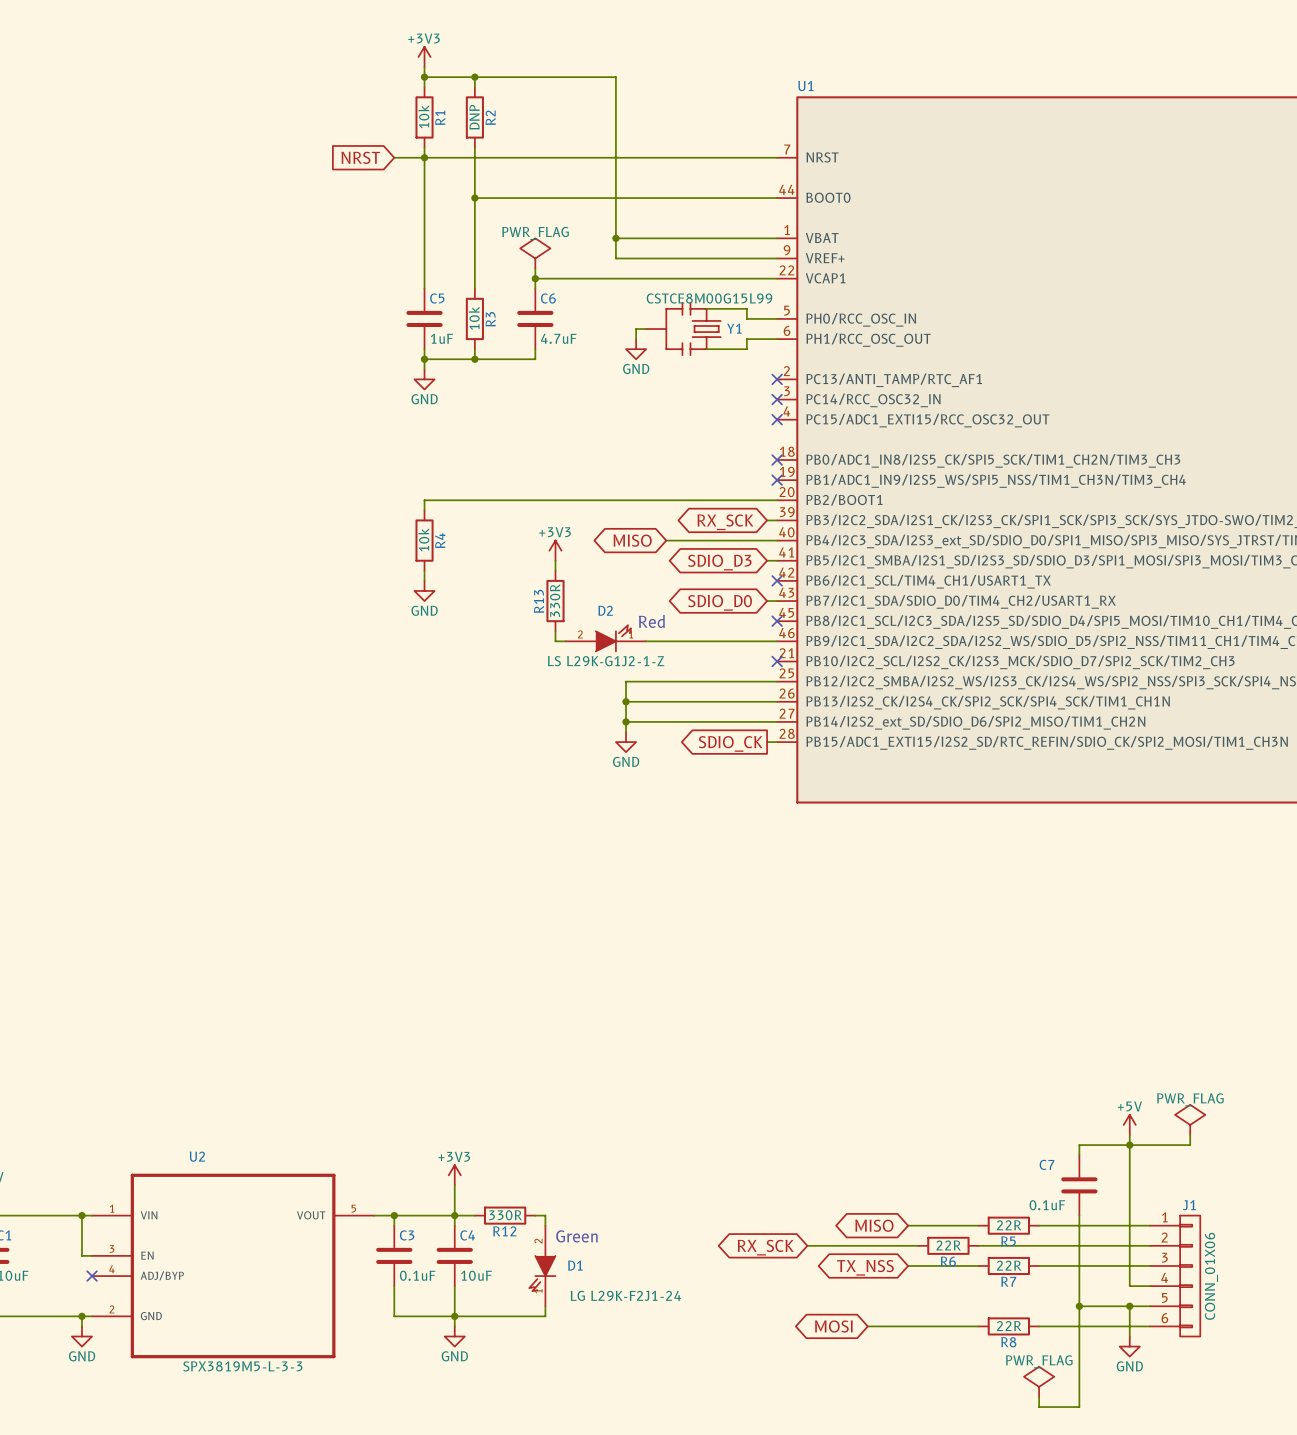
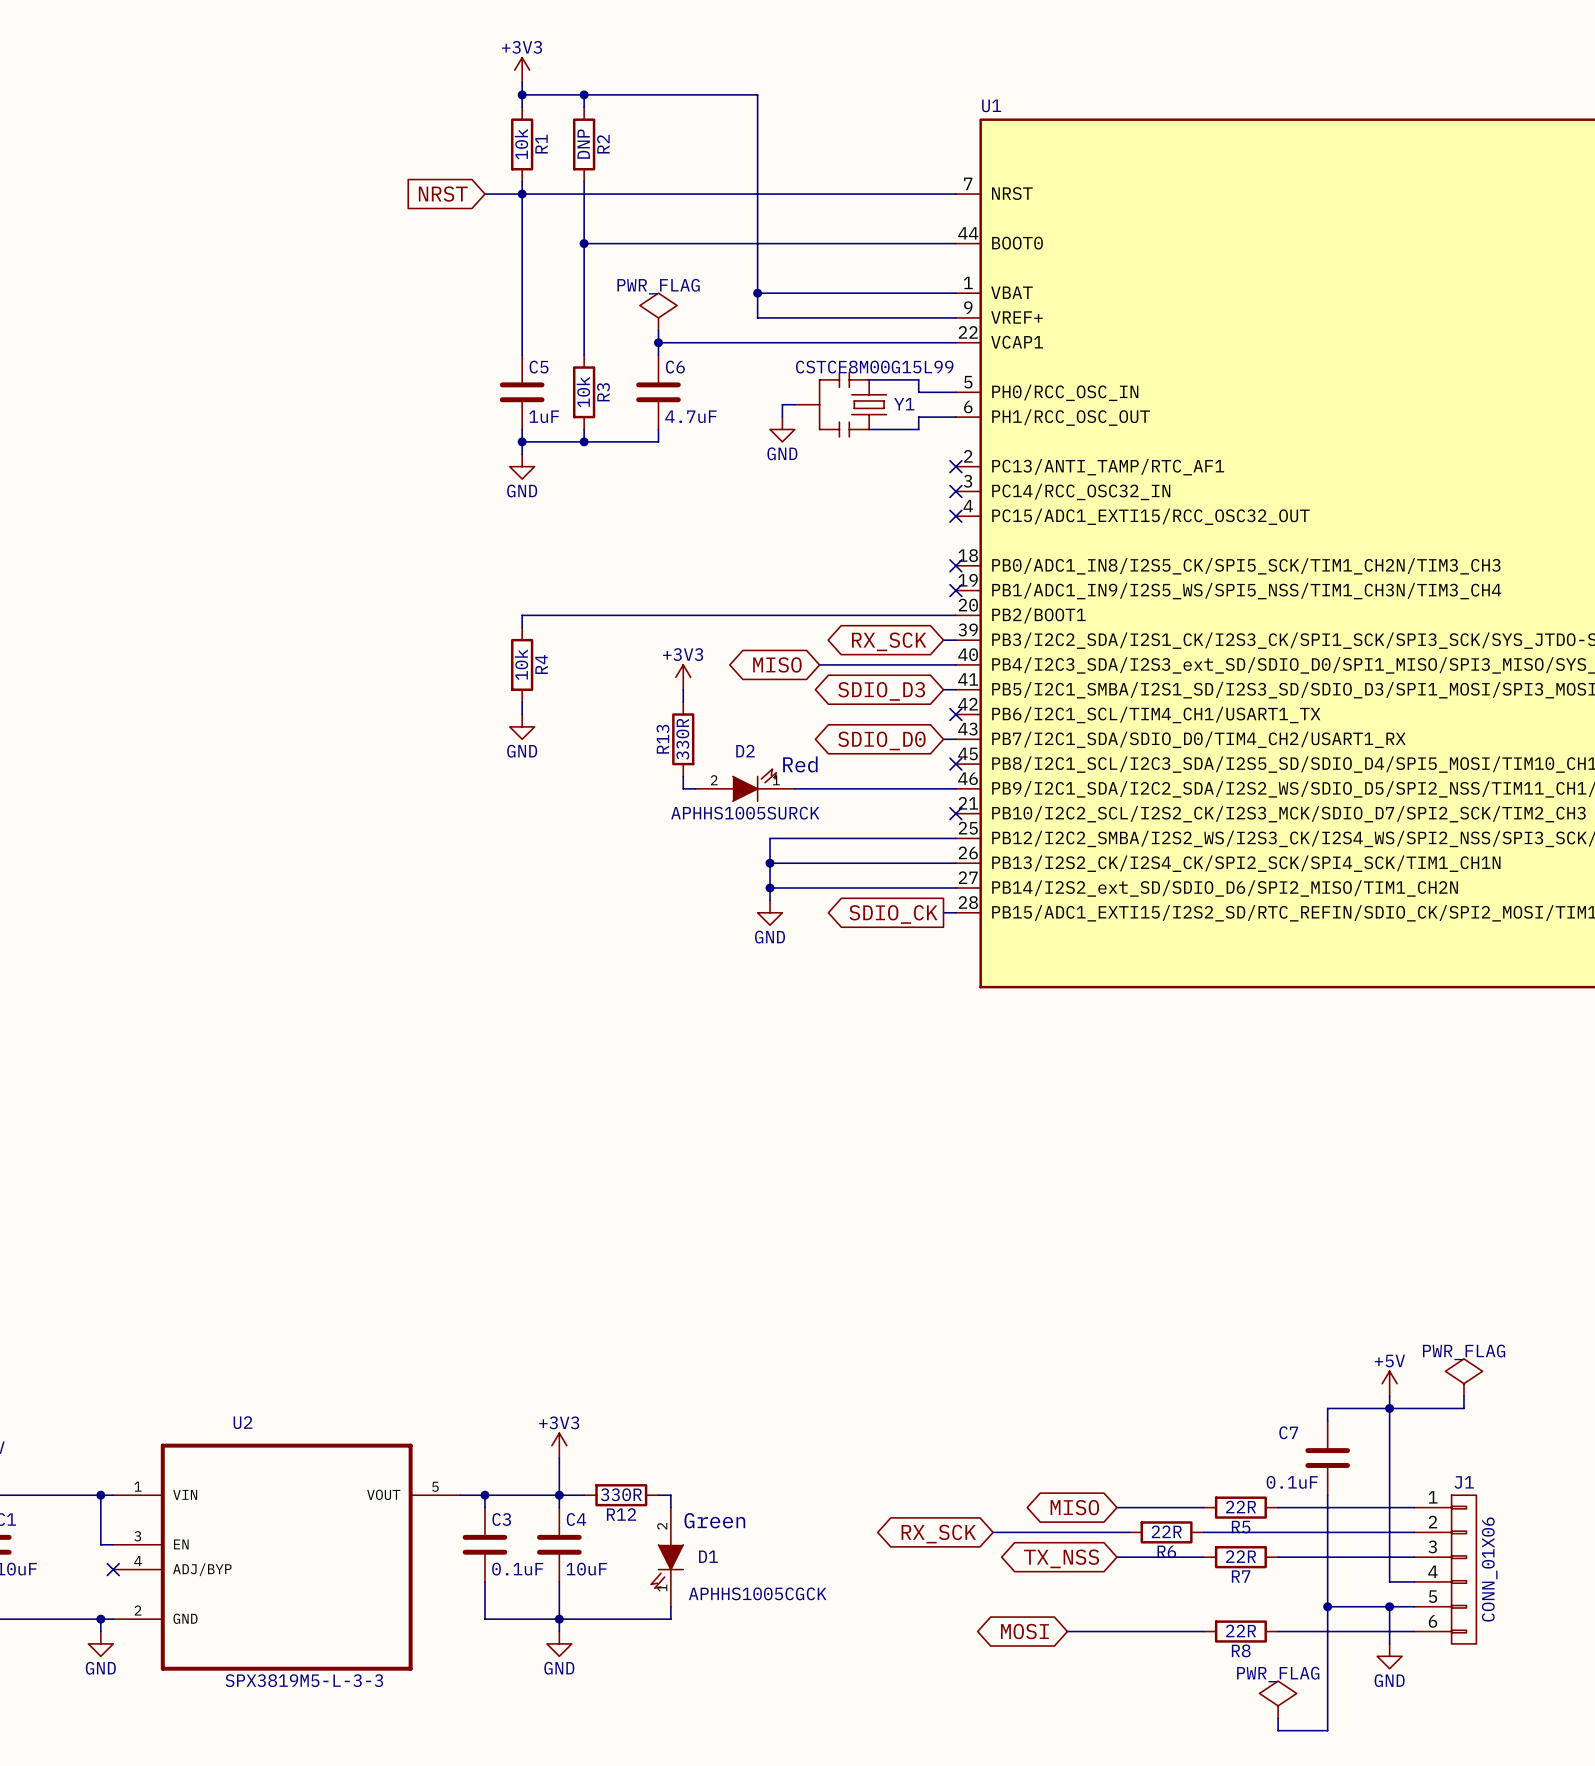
D2 value: LS L29K-G1J2-1-Z (606, 661) -> APHHS1005SURCK (745, 813)
D1 value: LG L29K-F2J1-24 (625, 1295) -> APHHS1005CGCK (757, 1593)

